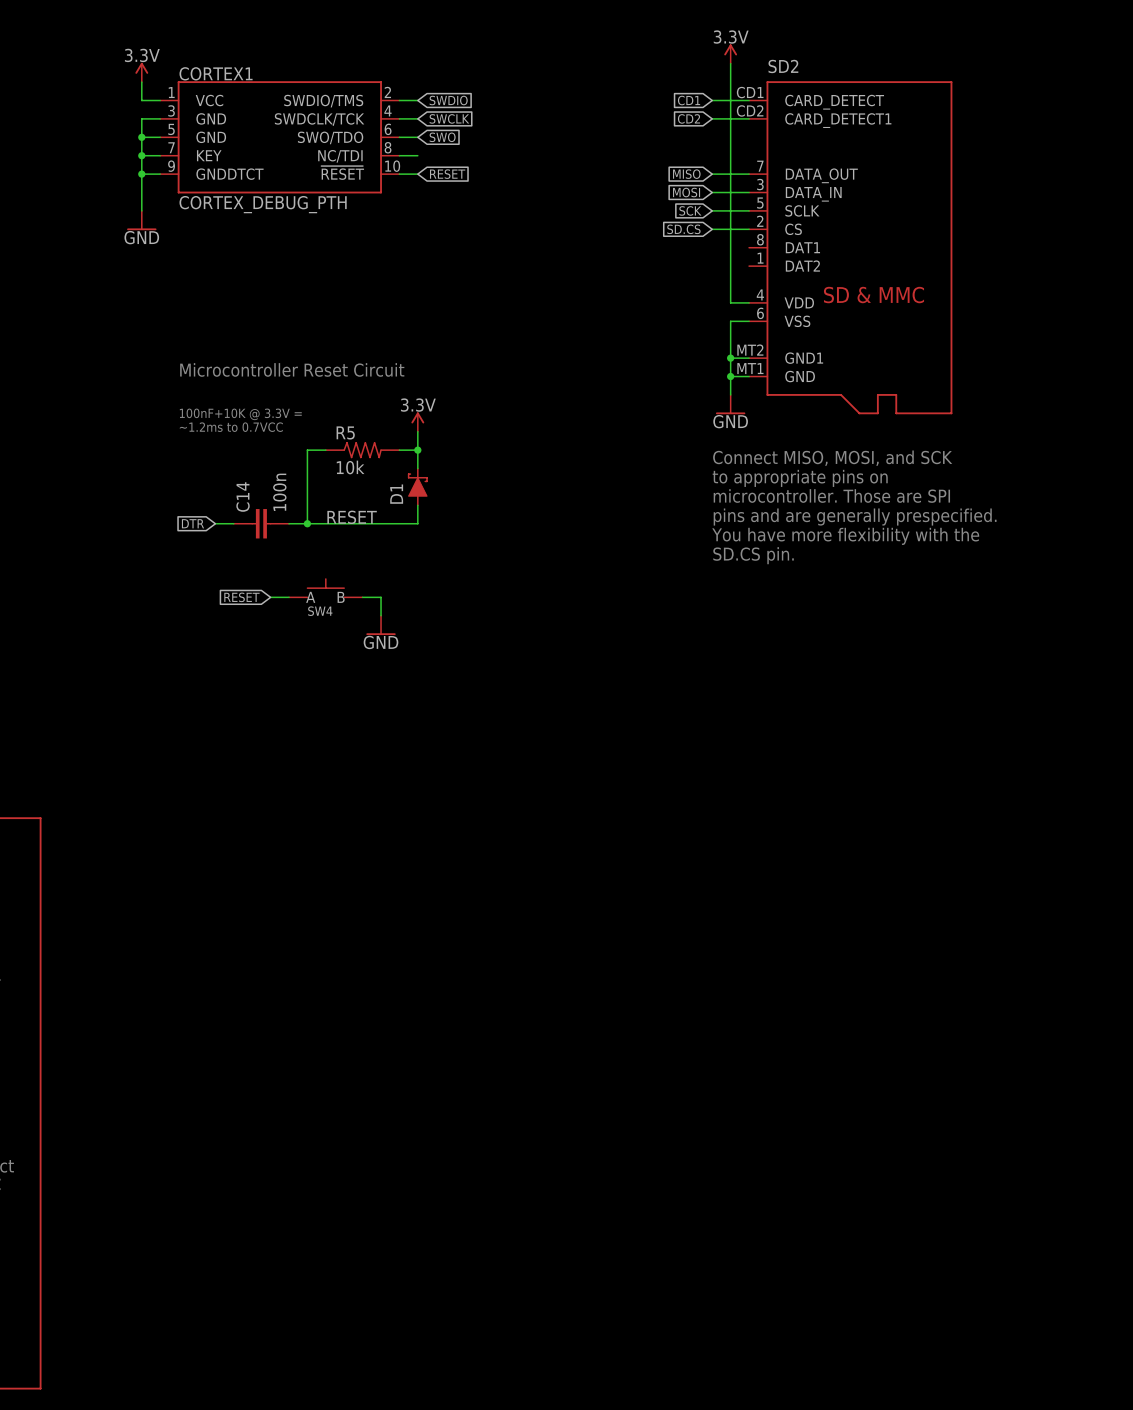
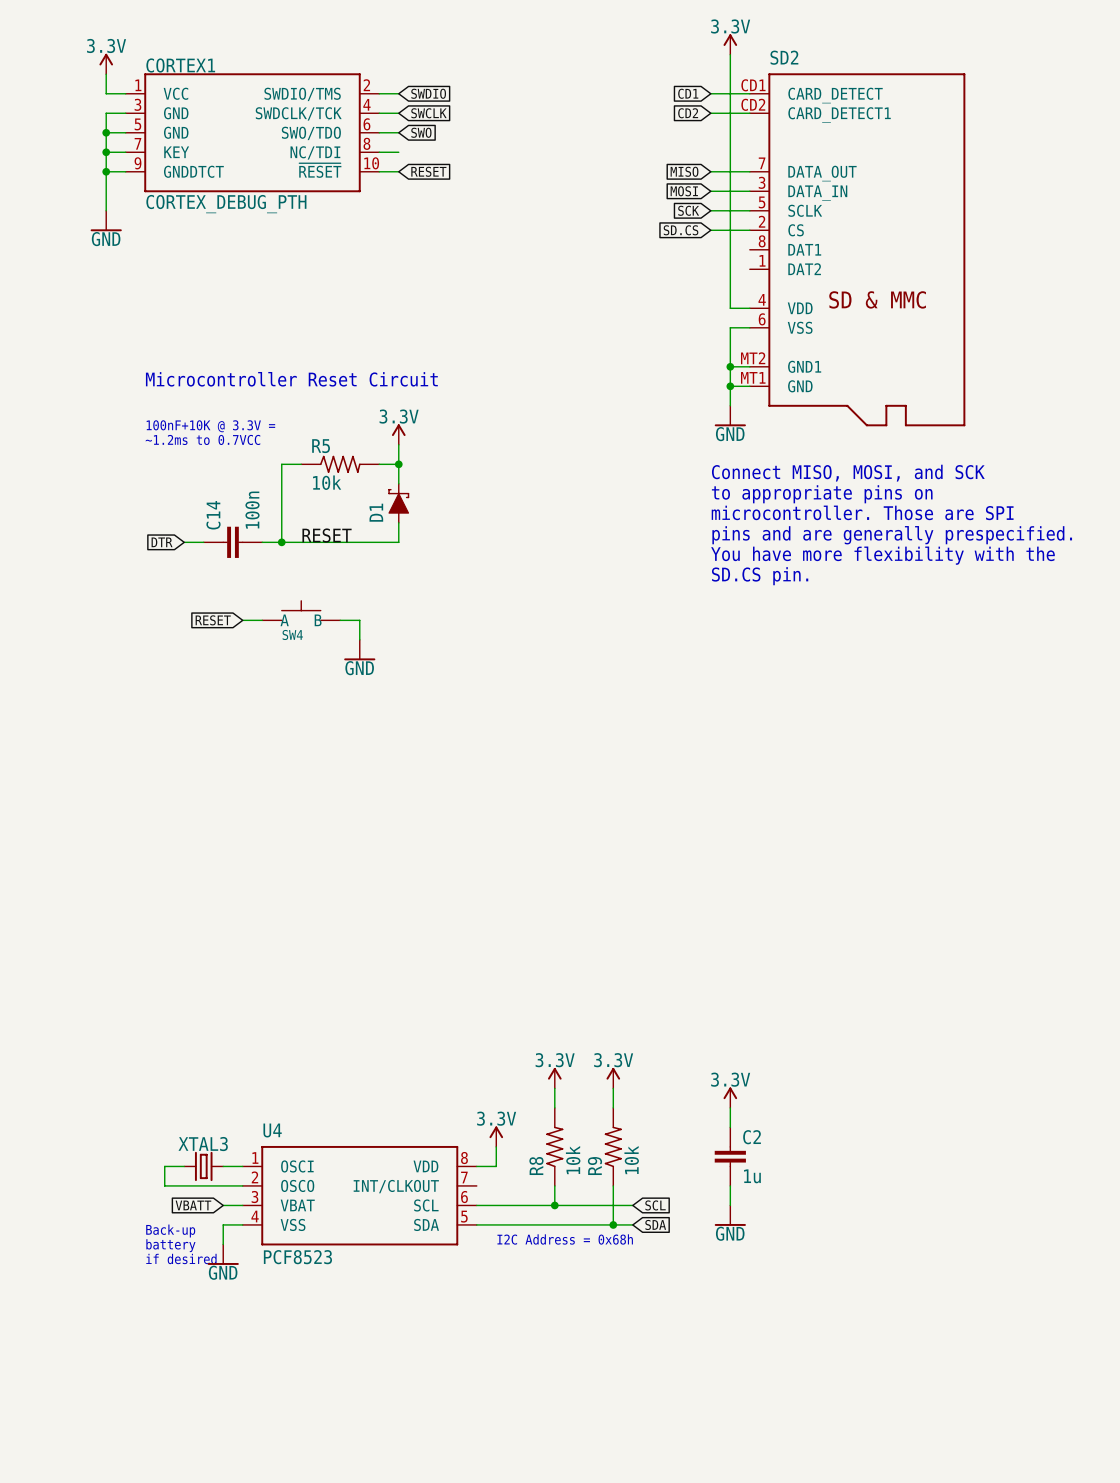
power symbol: none -> 3.3V (554, 1078)
power symbol: none -> 3.3V (613, 1078)
wire: none -> (554, 1088) (554, 1107)
wire: none -> (613, 1088) (613, 1107)
power symbol: none -> 3.3V (730, 1097)
wire: none -> (730, 1107) (730, 1127)
power symbol: none -> 3.3V (496, 1136)
wire: none -> (496, 1146) (496, 1166) (476, 1166)
R8: none -> 10k (554, 1146)
R9: none -> 10k (613, 1146)
C2: none -> 1u (730, 1156)
wire: none -> (184, 1166) (164, 1166) (164, 1185) (242, 1185)
XTAL3: none -> (203, 1166)
wire: none -> (223, 1166) (242, 1166)
wire: none -> (554, 1185) (554, 1205)
wire: none -> (613, 1185) (613, 1224)
wire: none -> (730, 1185) (730, 1205)
U4: none -> PCF8523 (359, 1195)
global label: none -> VBATT (193, 1205)
wire: none -> (223, 1205) (242, 1205)
wire: none -> (476, 1205) (632, 1205)
junction: none -> (554, 1205)
global label: none -> SCL (655, 1205)
power symbol: none -> GND (730, 1215)
wire: none -> (242, 1224) (223, 1224) (223, 1244)
wire: none -> (476, 1224) (632, 1224)
junction: none -> (613, 1224)
global label: none -> SDA (655, 1224)
text: none -> Back-up (170, 1231)
text: none -> I2C Address = 0x68h (565, 1239)
text: none -> battery (170, 1245)
power symbol: none -> GND (223, 1254)
text: none -> if desired (181, 1258)

